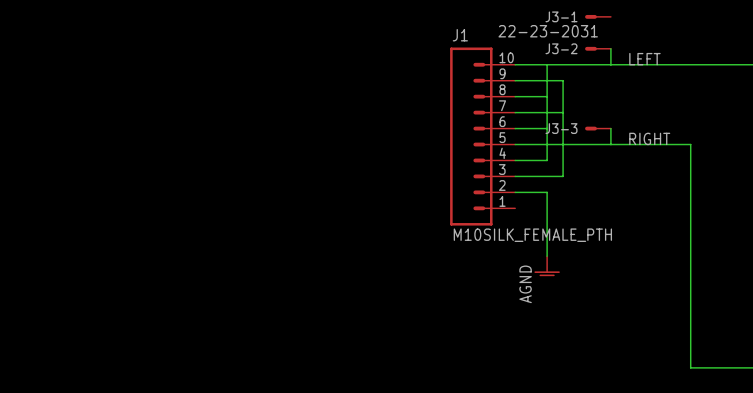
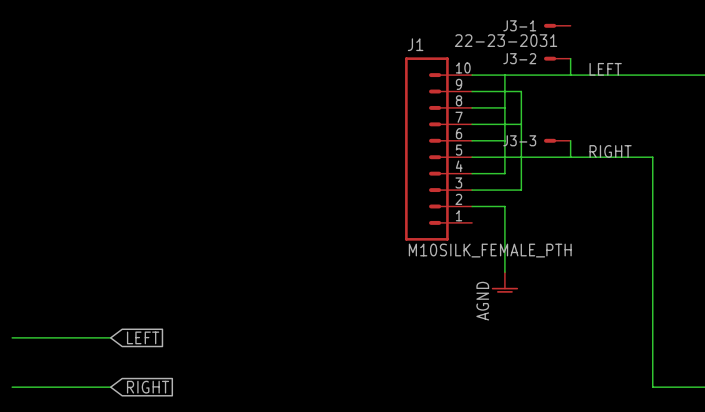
wire: none -> (12, 337) (110, 337)
global label: none -> LEFT (143, 337)
wire: none -> (12, 387) (110, 387)
global label: none -> RIGHT (148, 387)

